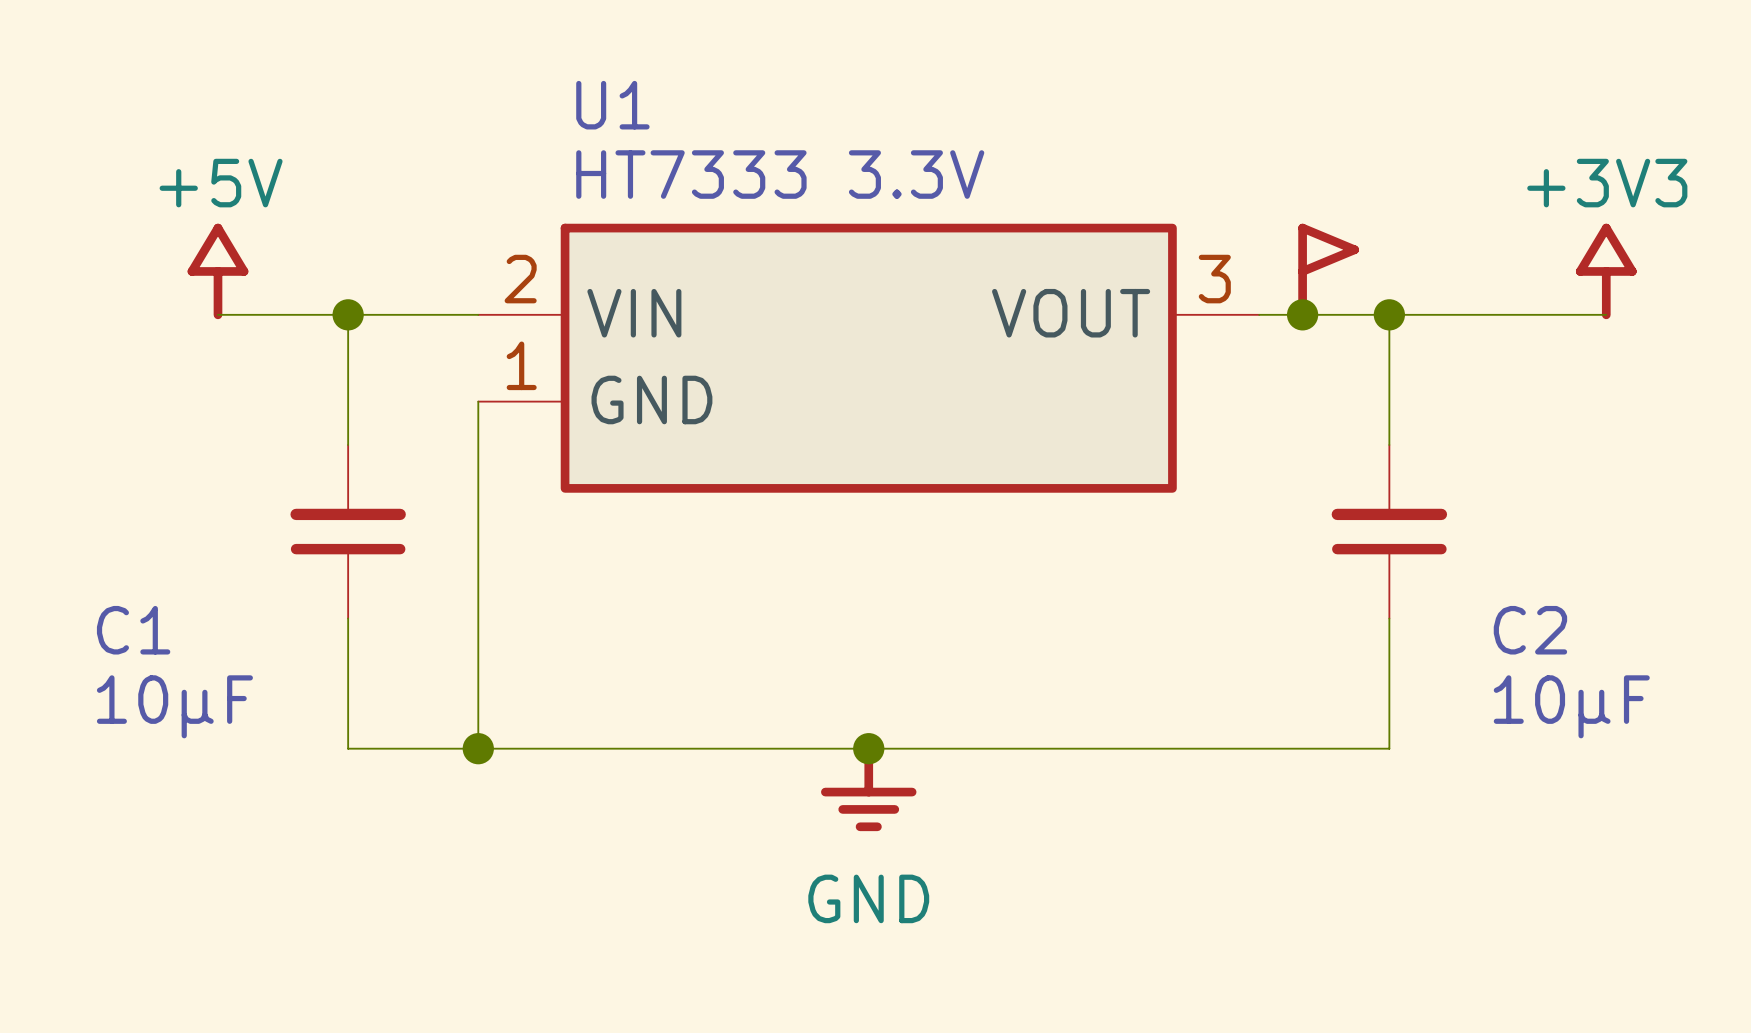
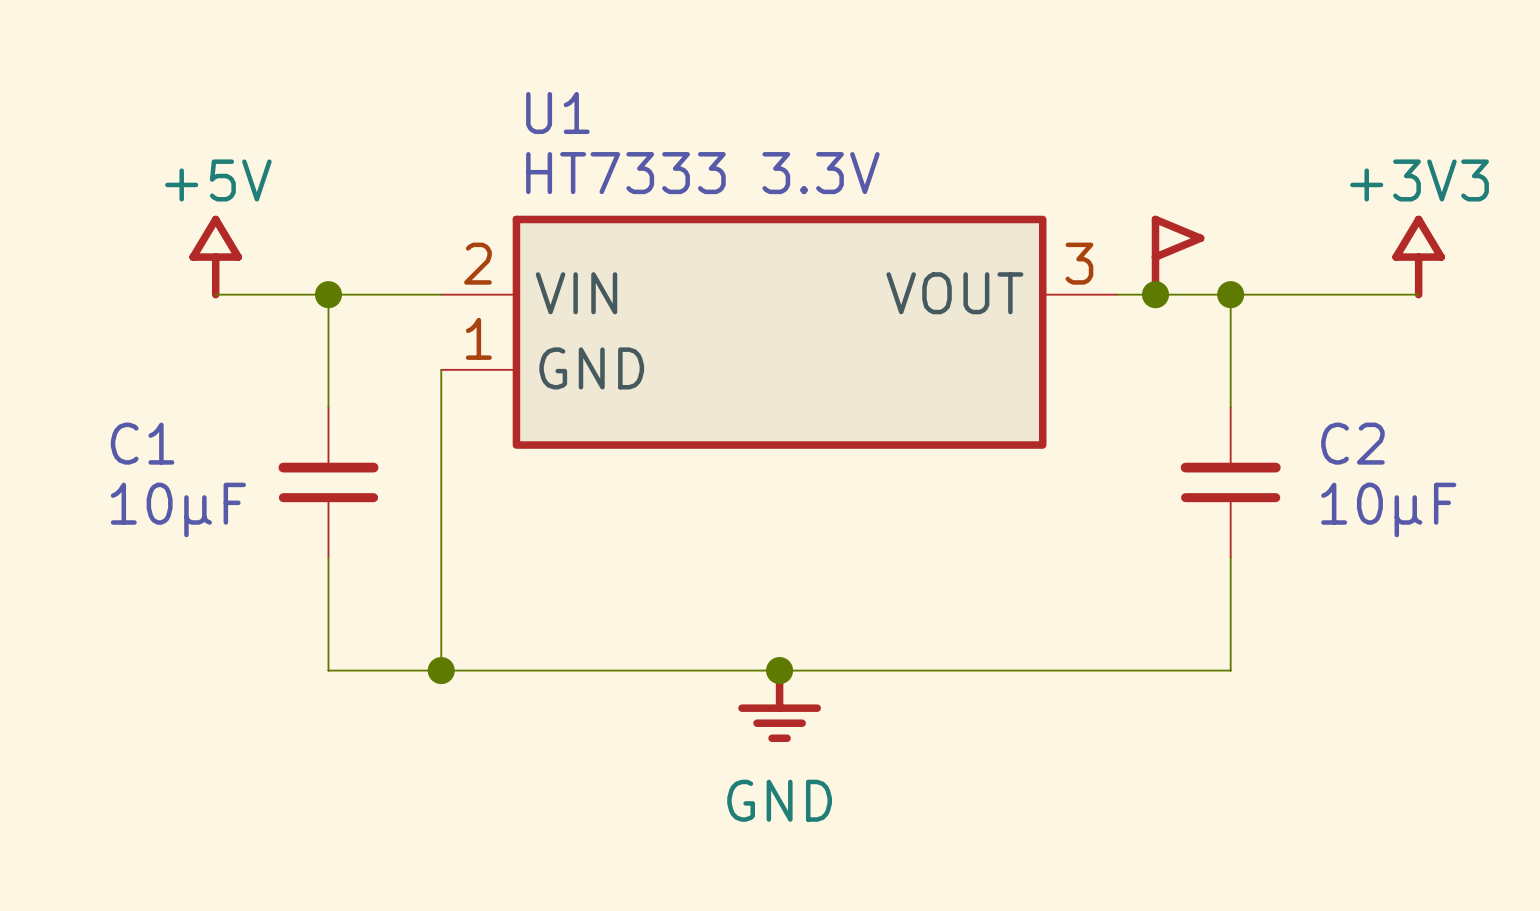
text position: C1 (133, 630) -> C1 (142, 443)
text position: C2 (1530, 630) -> C2 (1352, 443)
text position: 10µF (174, 706) -> 10µF (178, 509)
text position: 10µF (1571, 706) -> 10µF (1388, 509)

